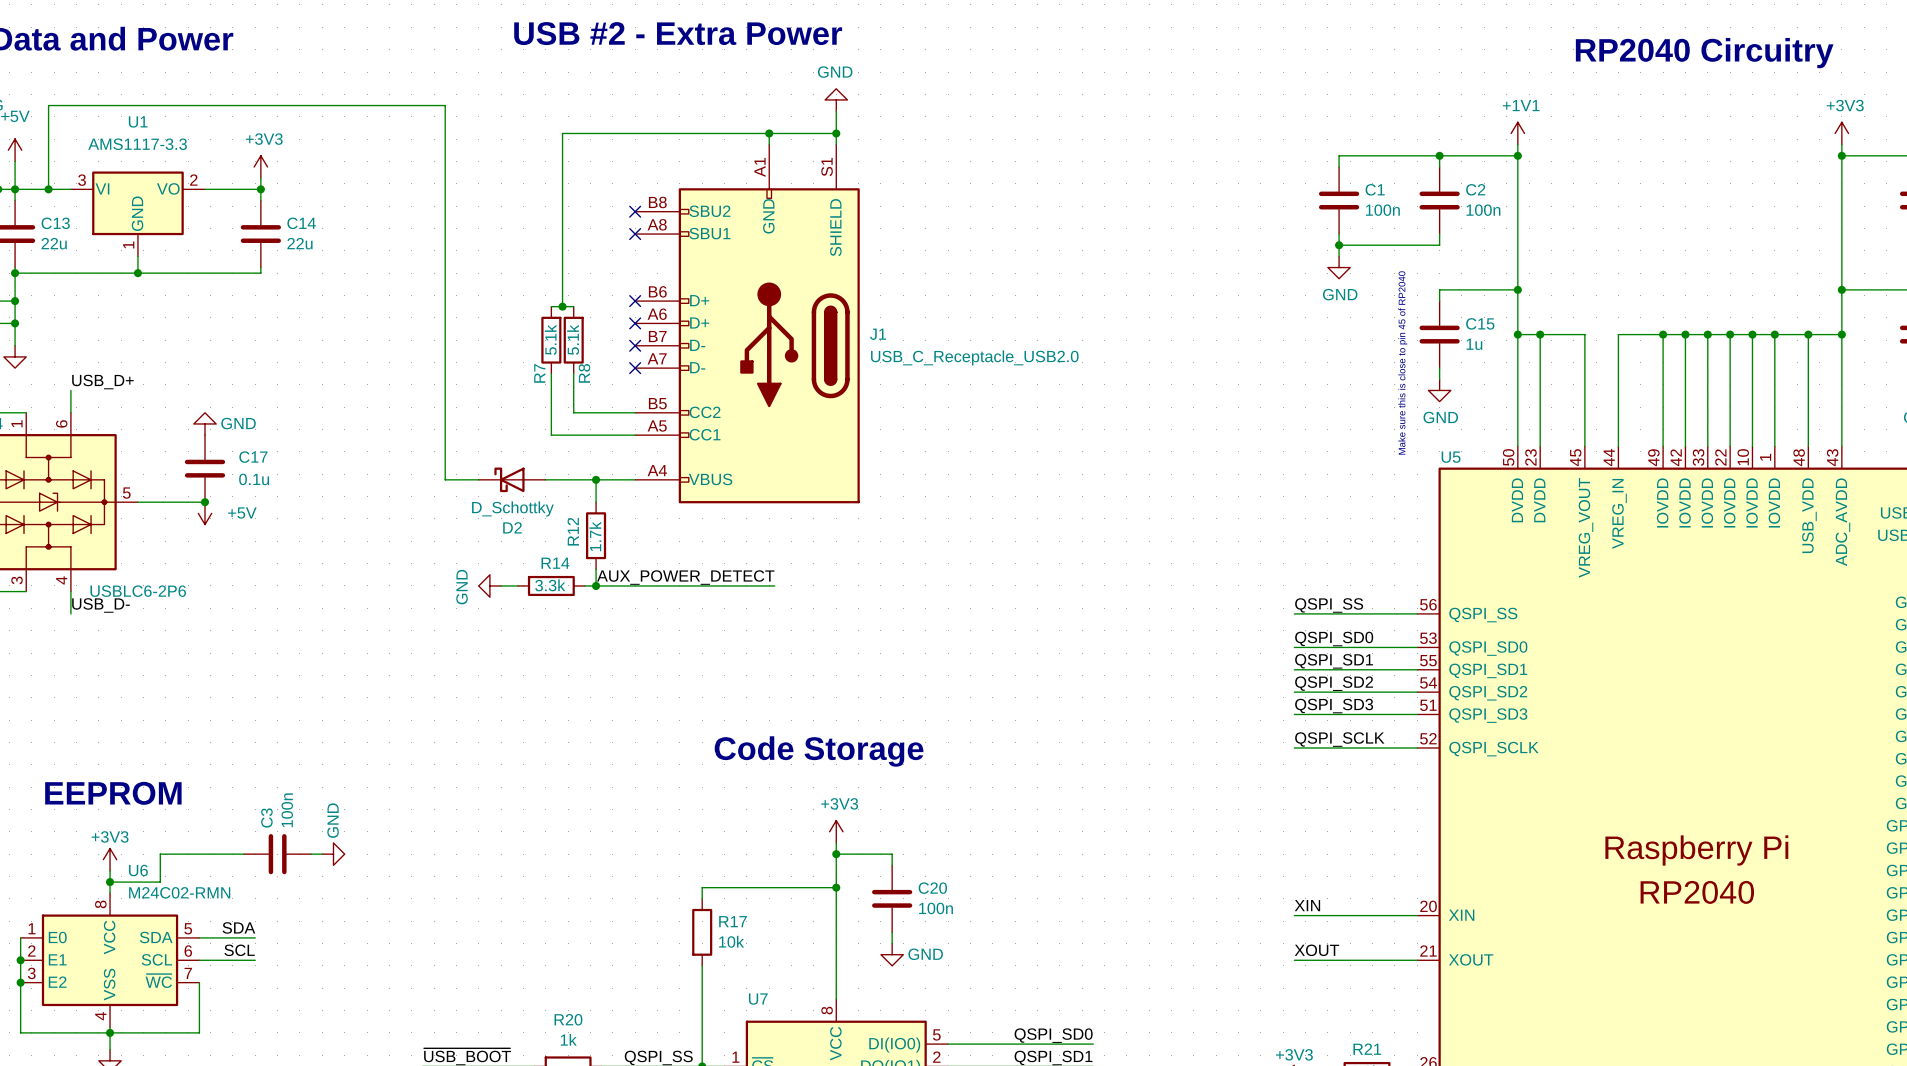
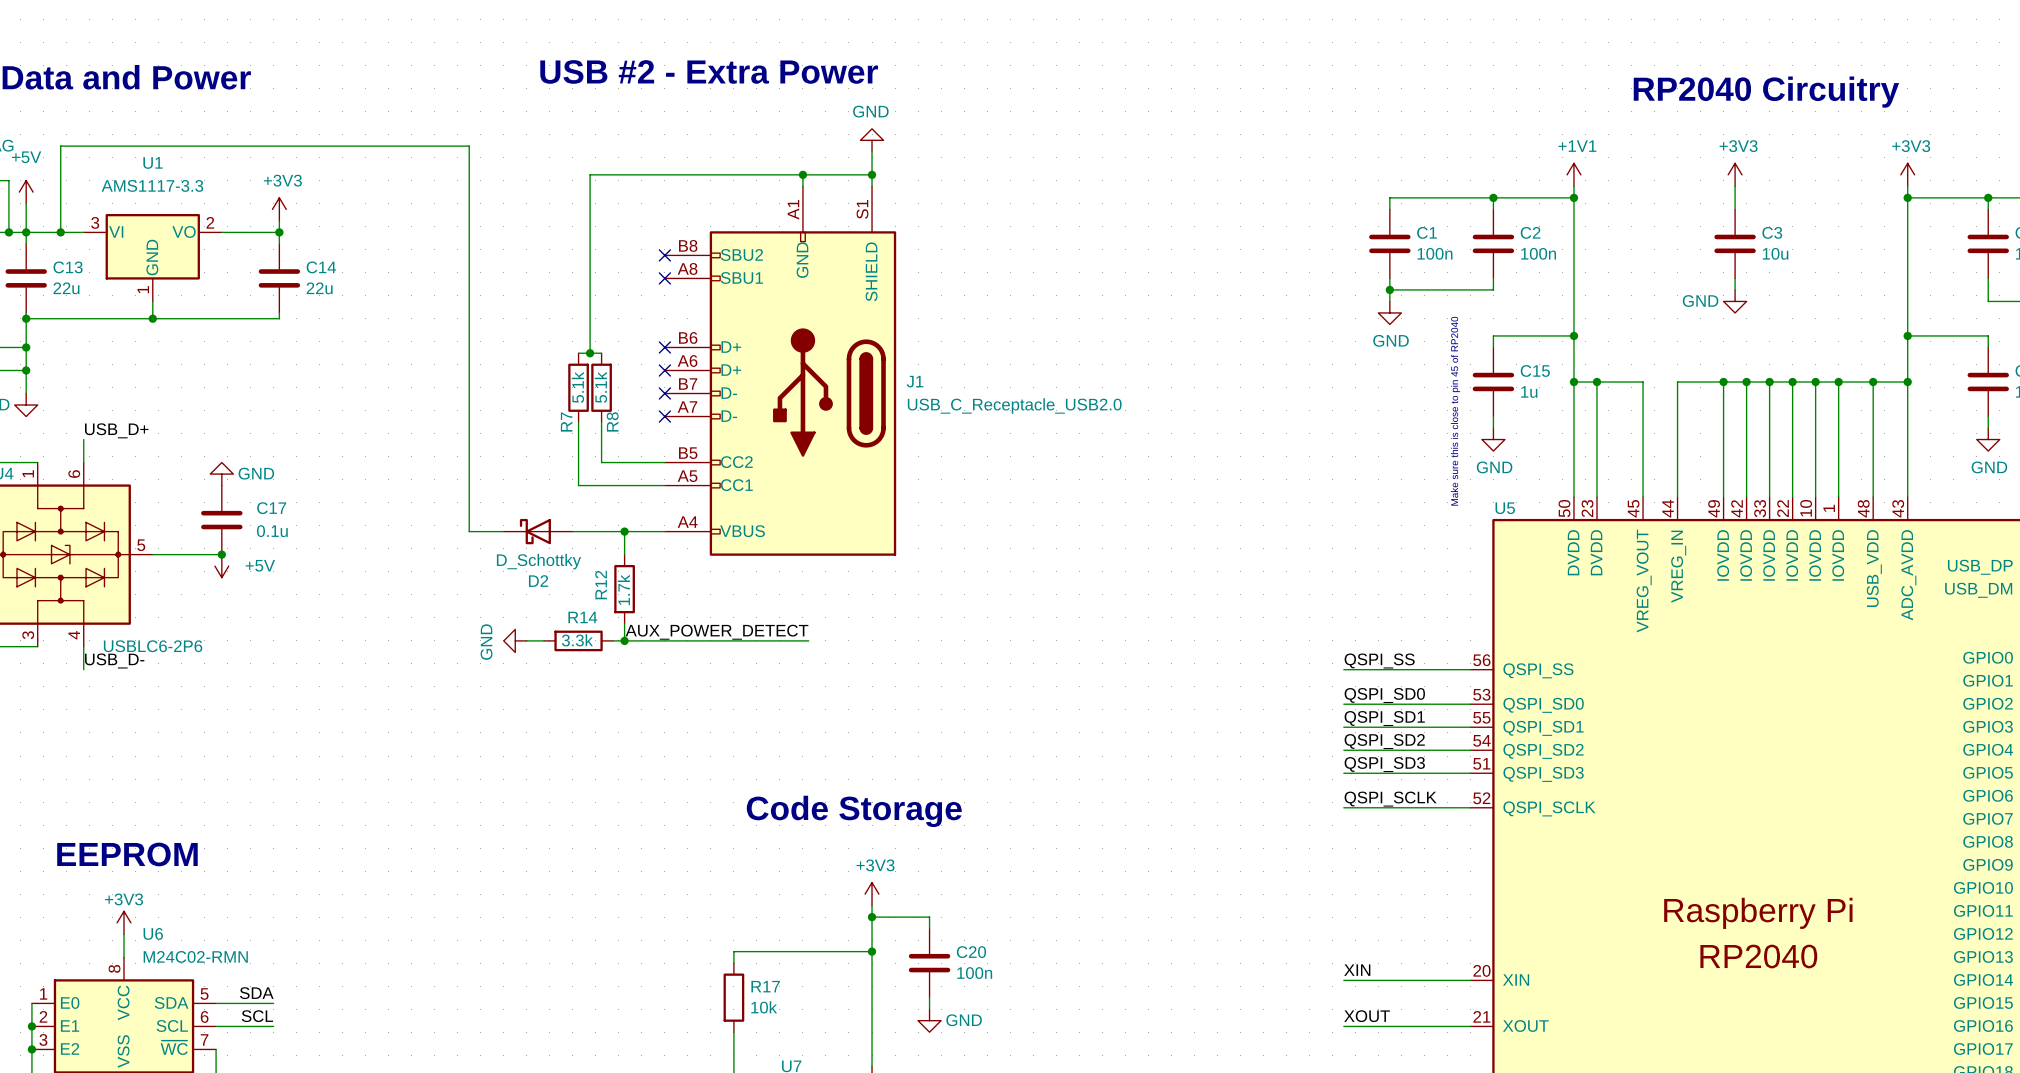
power symbol: none -> +3V3 (1735, 174)
wire: none -> (1735, 186) (1735, 209)
wire: none -> (1735, 278) (1735, 289)
power symbol: none -> GND (1735, 301)
C3 value: 100n (287, 810) -> 10u (1775, 253)
wire: (244, 854) (160, 854) (160, 882) (110, 882) -> none
C3 rotation: 0° (277, 854) -> 90° clockwise (1735, 243)
C3 position: (277, 854) -> (1735, 243)
wire: (311, 854) (322, 854) -> none
power symbol: GND (333, 854) -> none
junction: (110, 882) -> none

